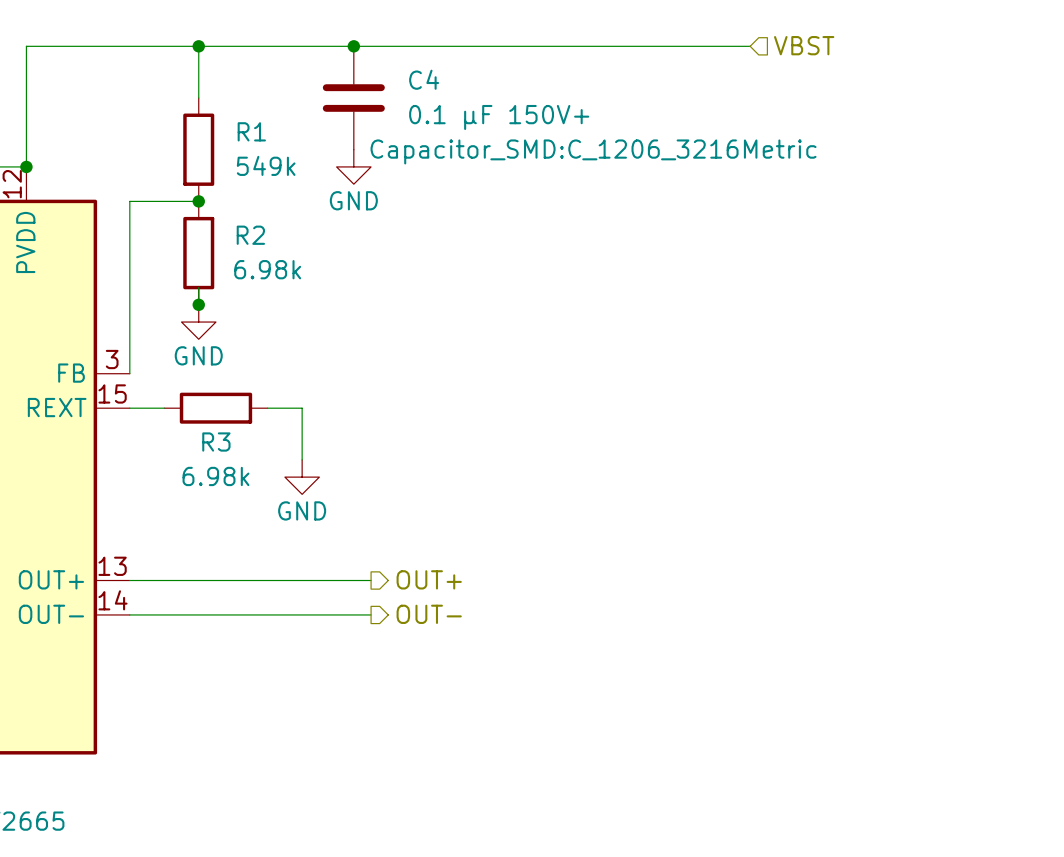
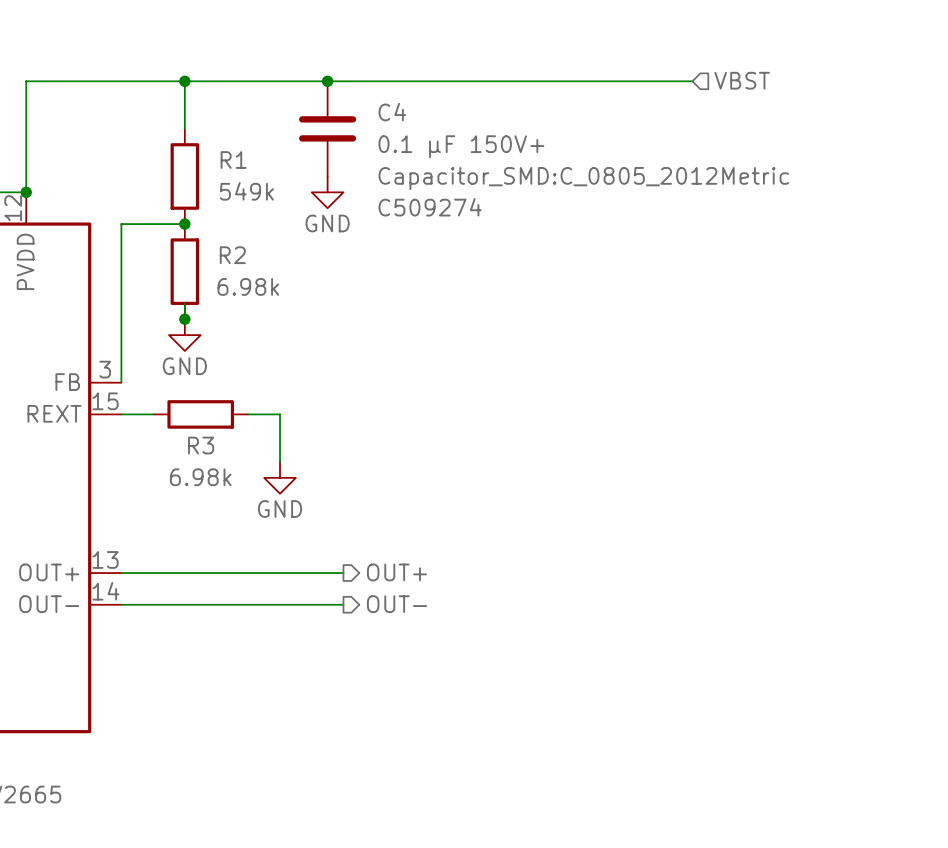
C4 text: Capacitor_SMD:C_1206_3216Metric (593, 151) -> Capacitor_SMD:C_0805_2012Metric (583, 178)
C4 text: none -> C509274 (430, 207)

